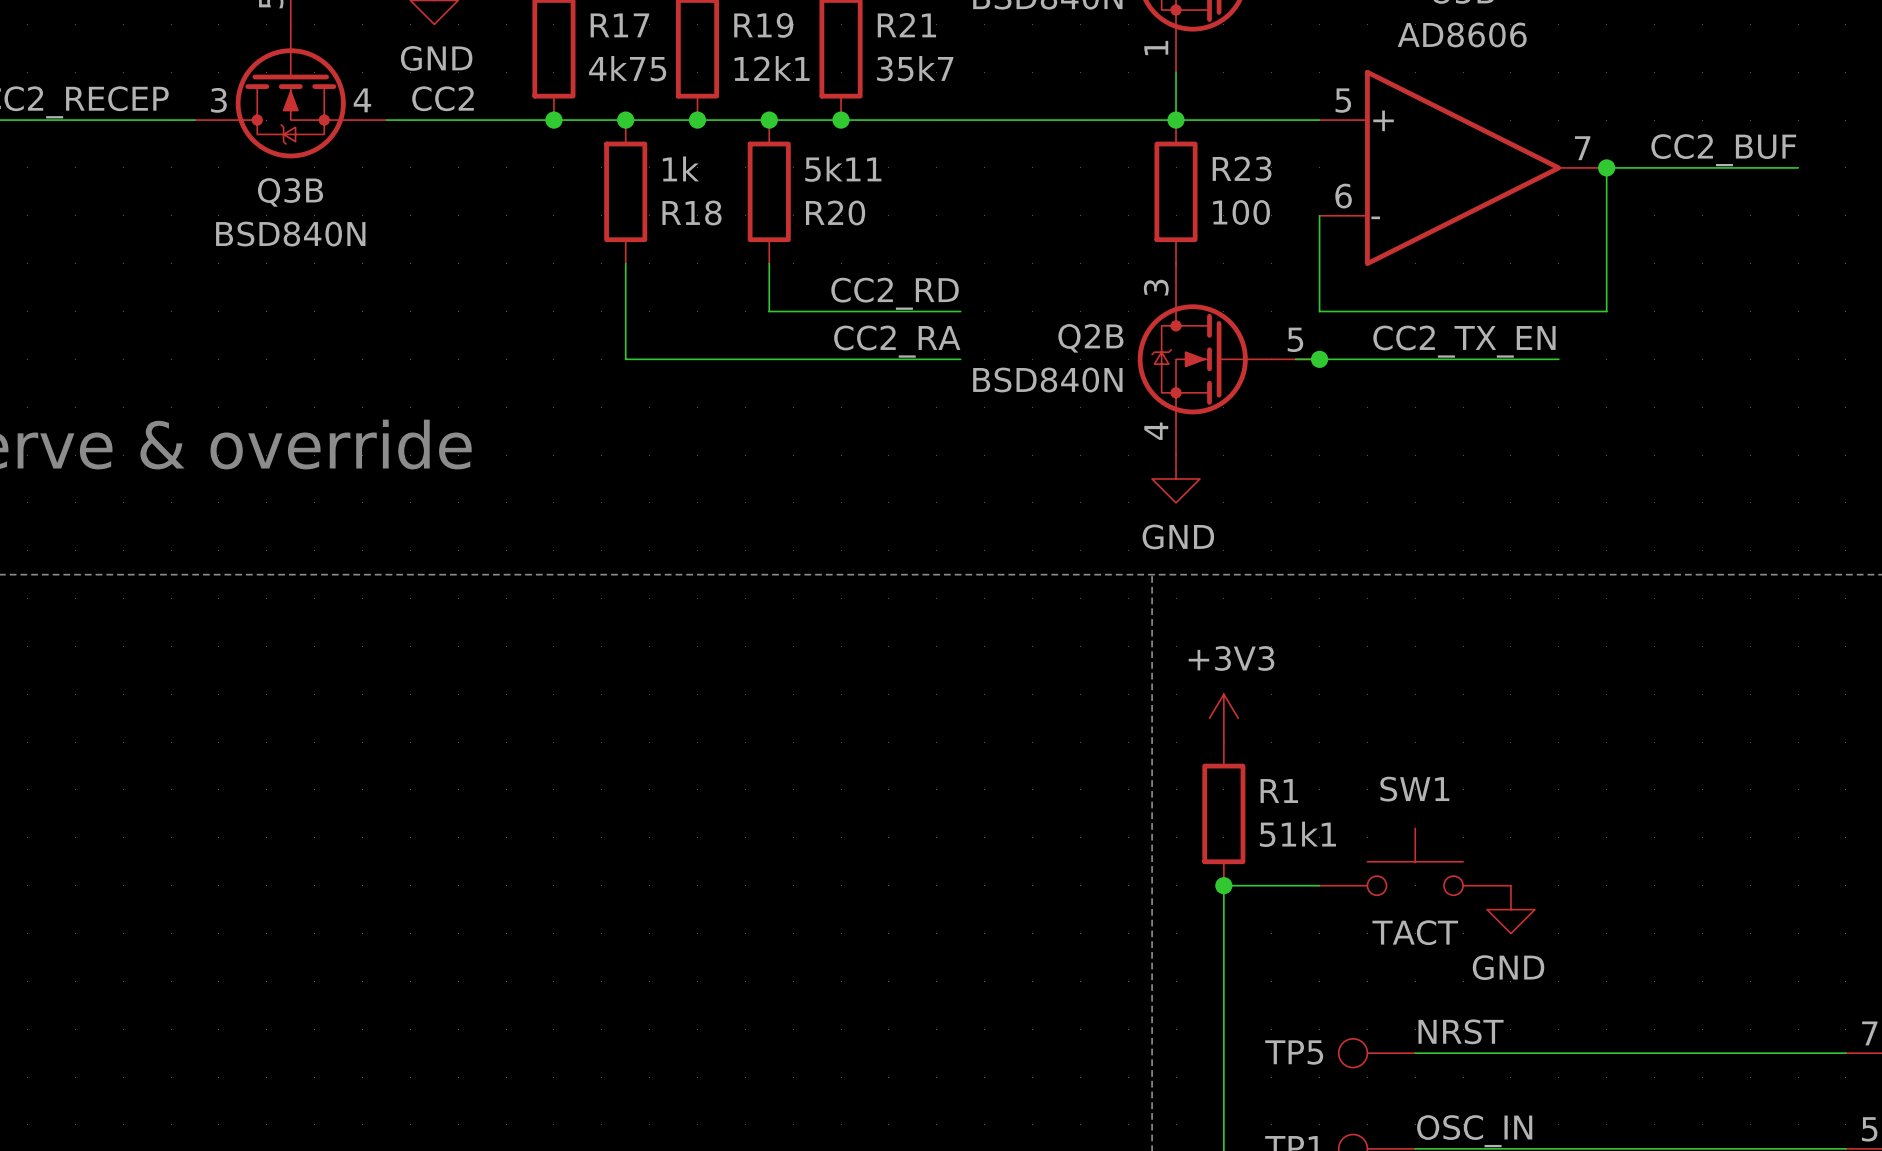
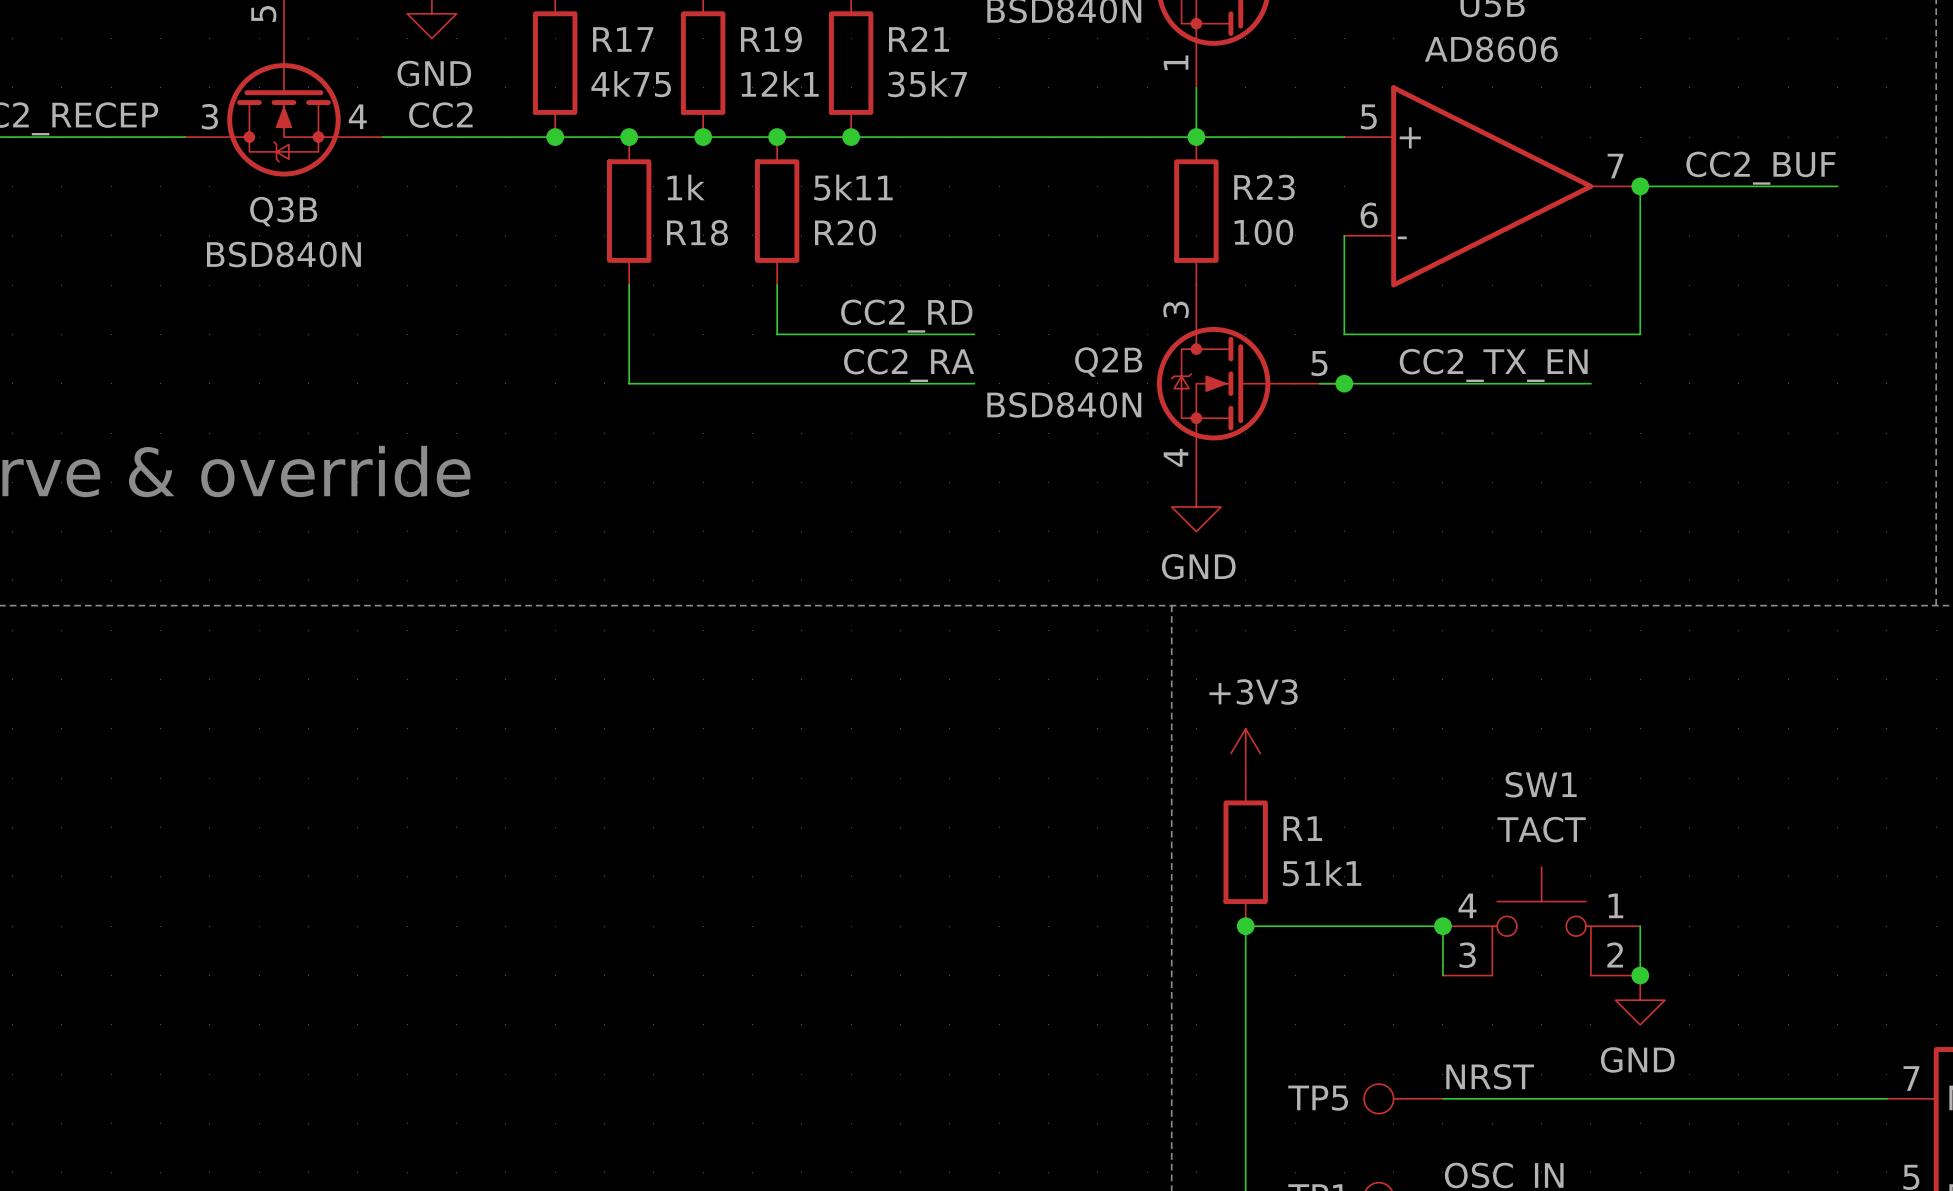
SW1 name position: SW1 (1414, 789) -> SW1 (1541, 784)
SW1 symbol: [1319, 828, 1511, 896] -> [1442, 867, 1641, 976]
wire: none -> (1344, 926) (1442, 926) (1442, 975)
junction: none -> (1442, 926)
wire: none -> (1640, 926) (1640, 975)
power symbol position: GND (1510, 909) -> GND (1640, 1000)
SW1 value position: TACT (1415, 932) -> TACT (1541, 829)
junction: none -> (1640, 975)

